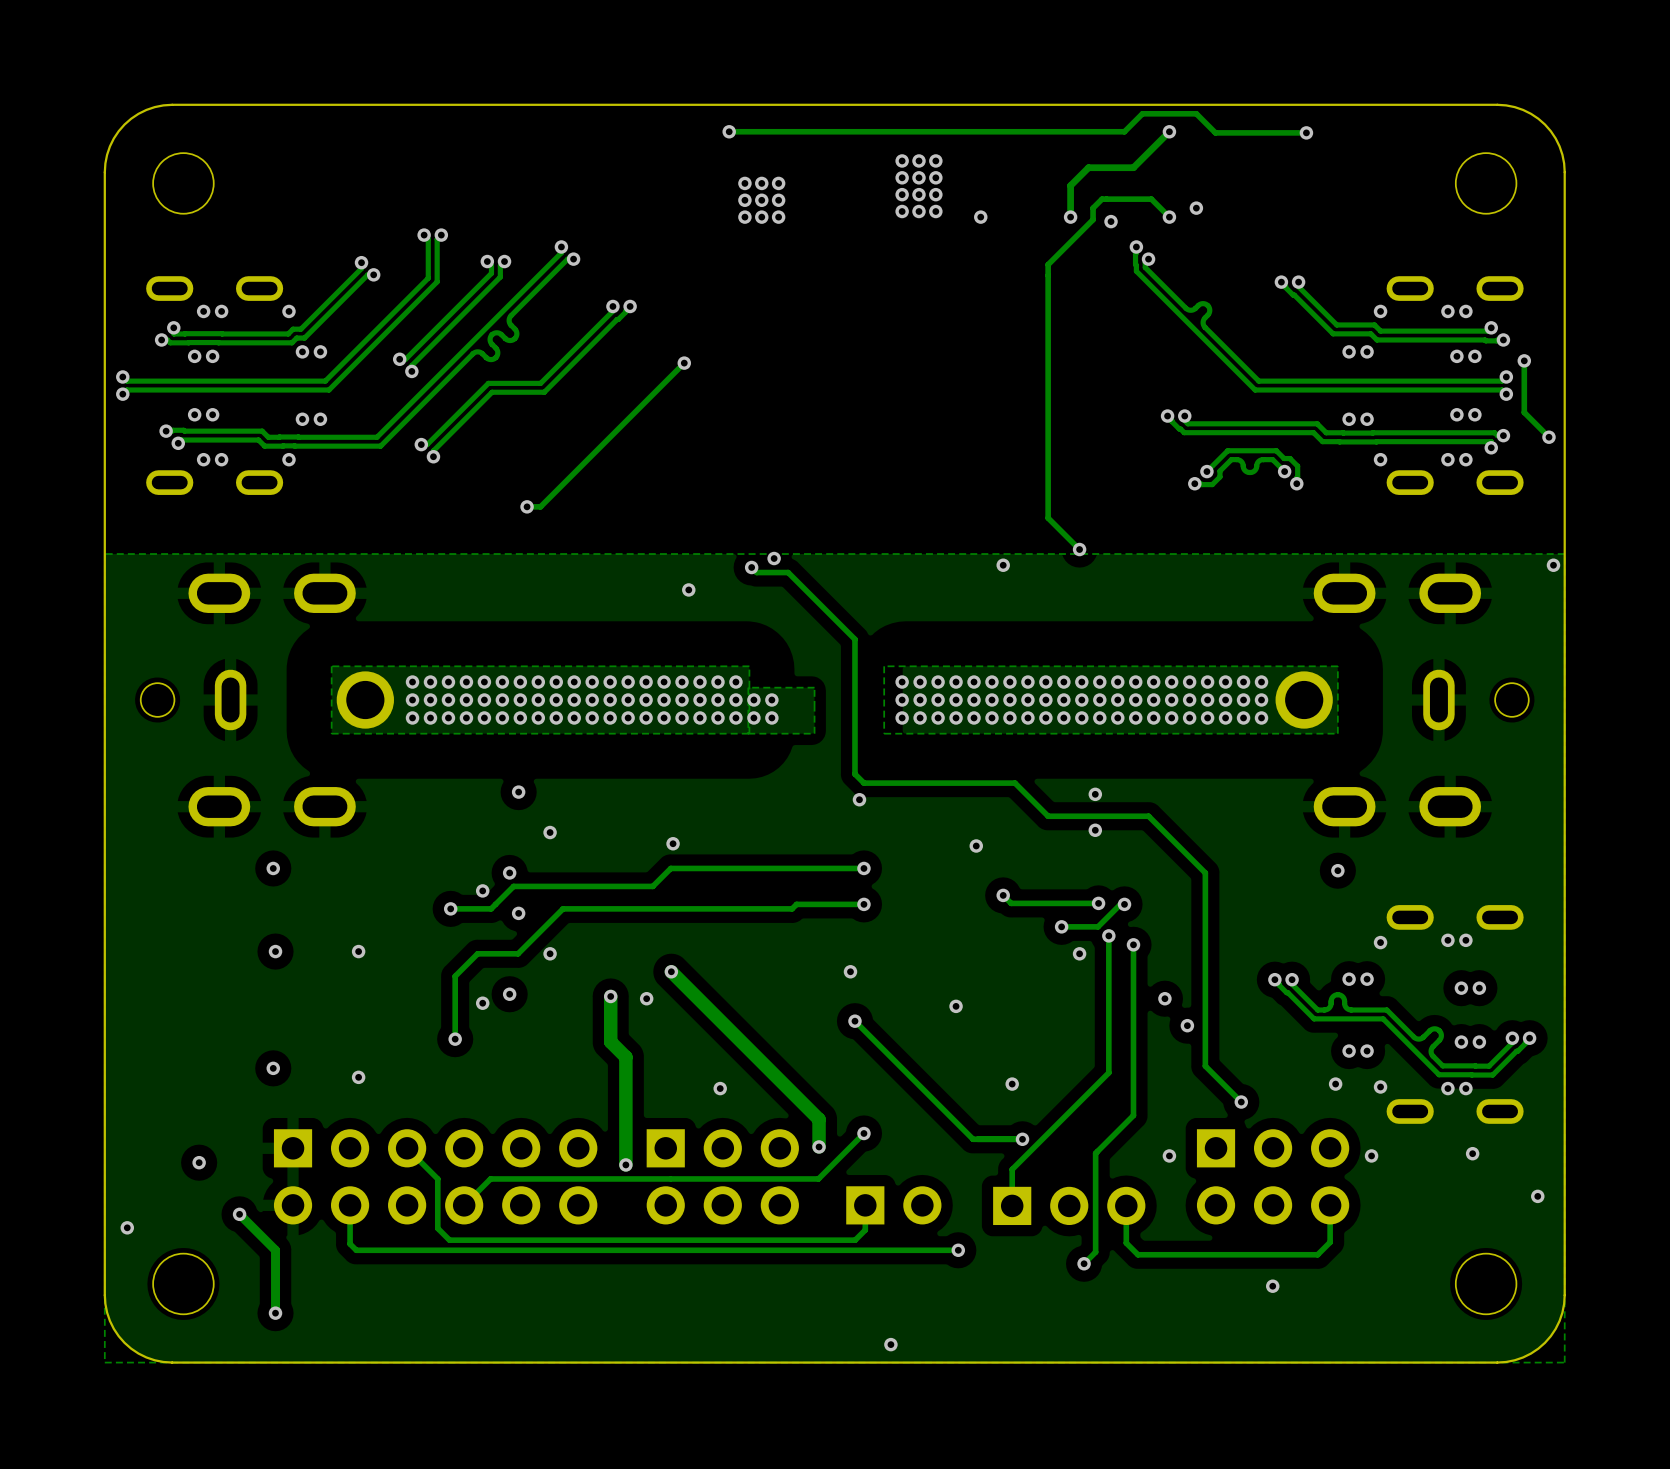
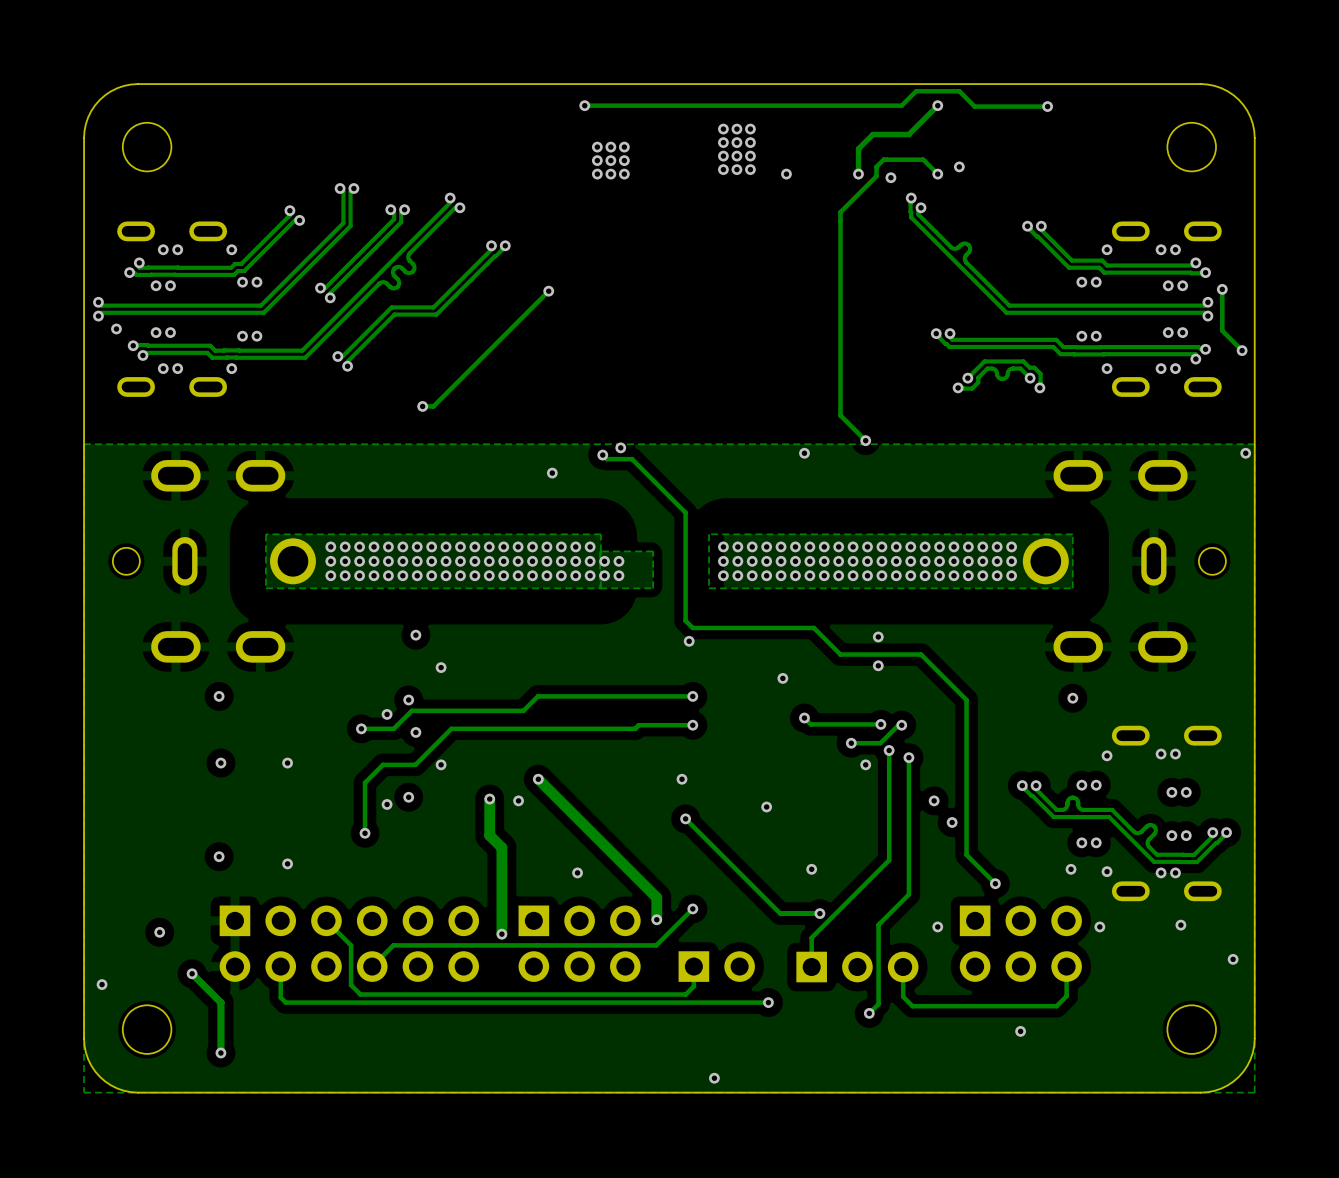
via: none -> (116, 328)
via: (673, 843) -> none

